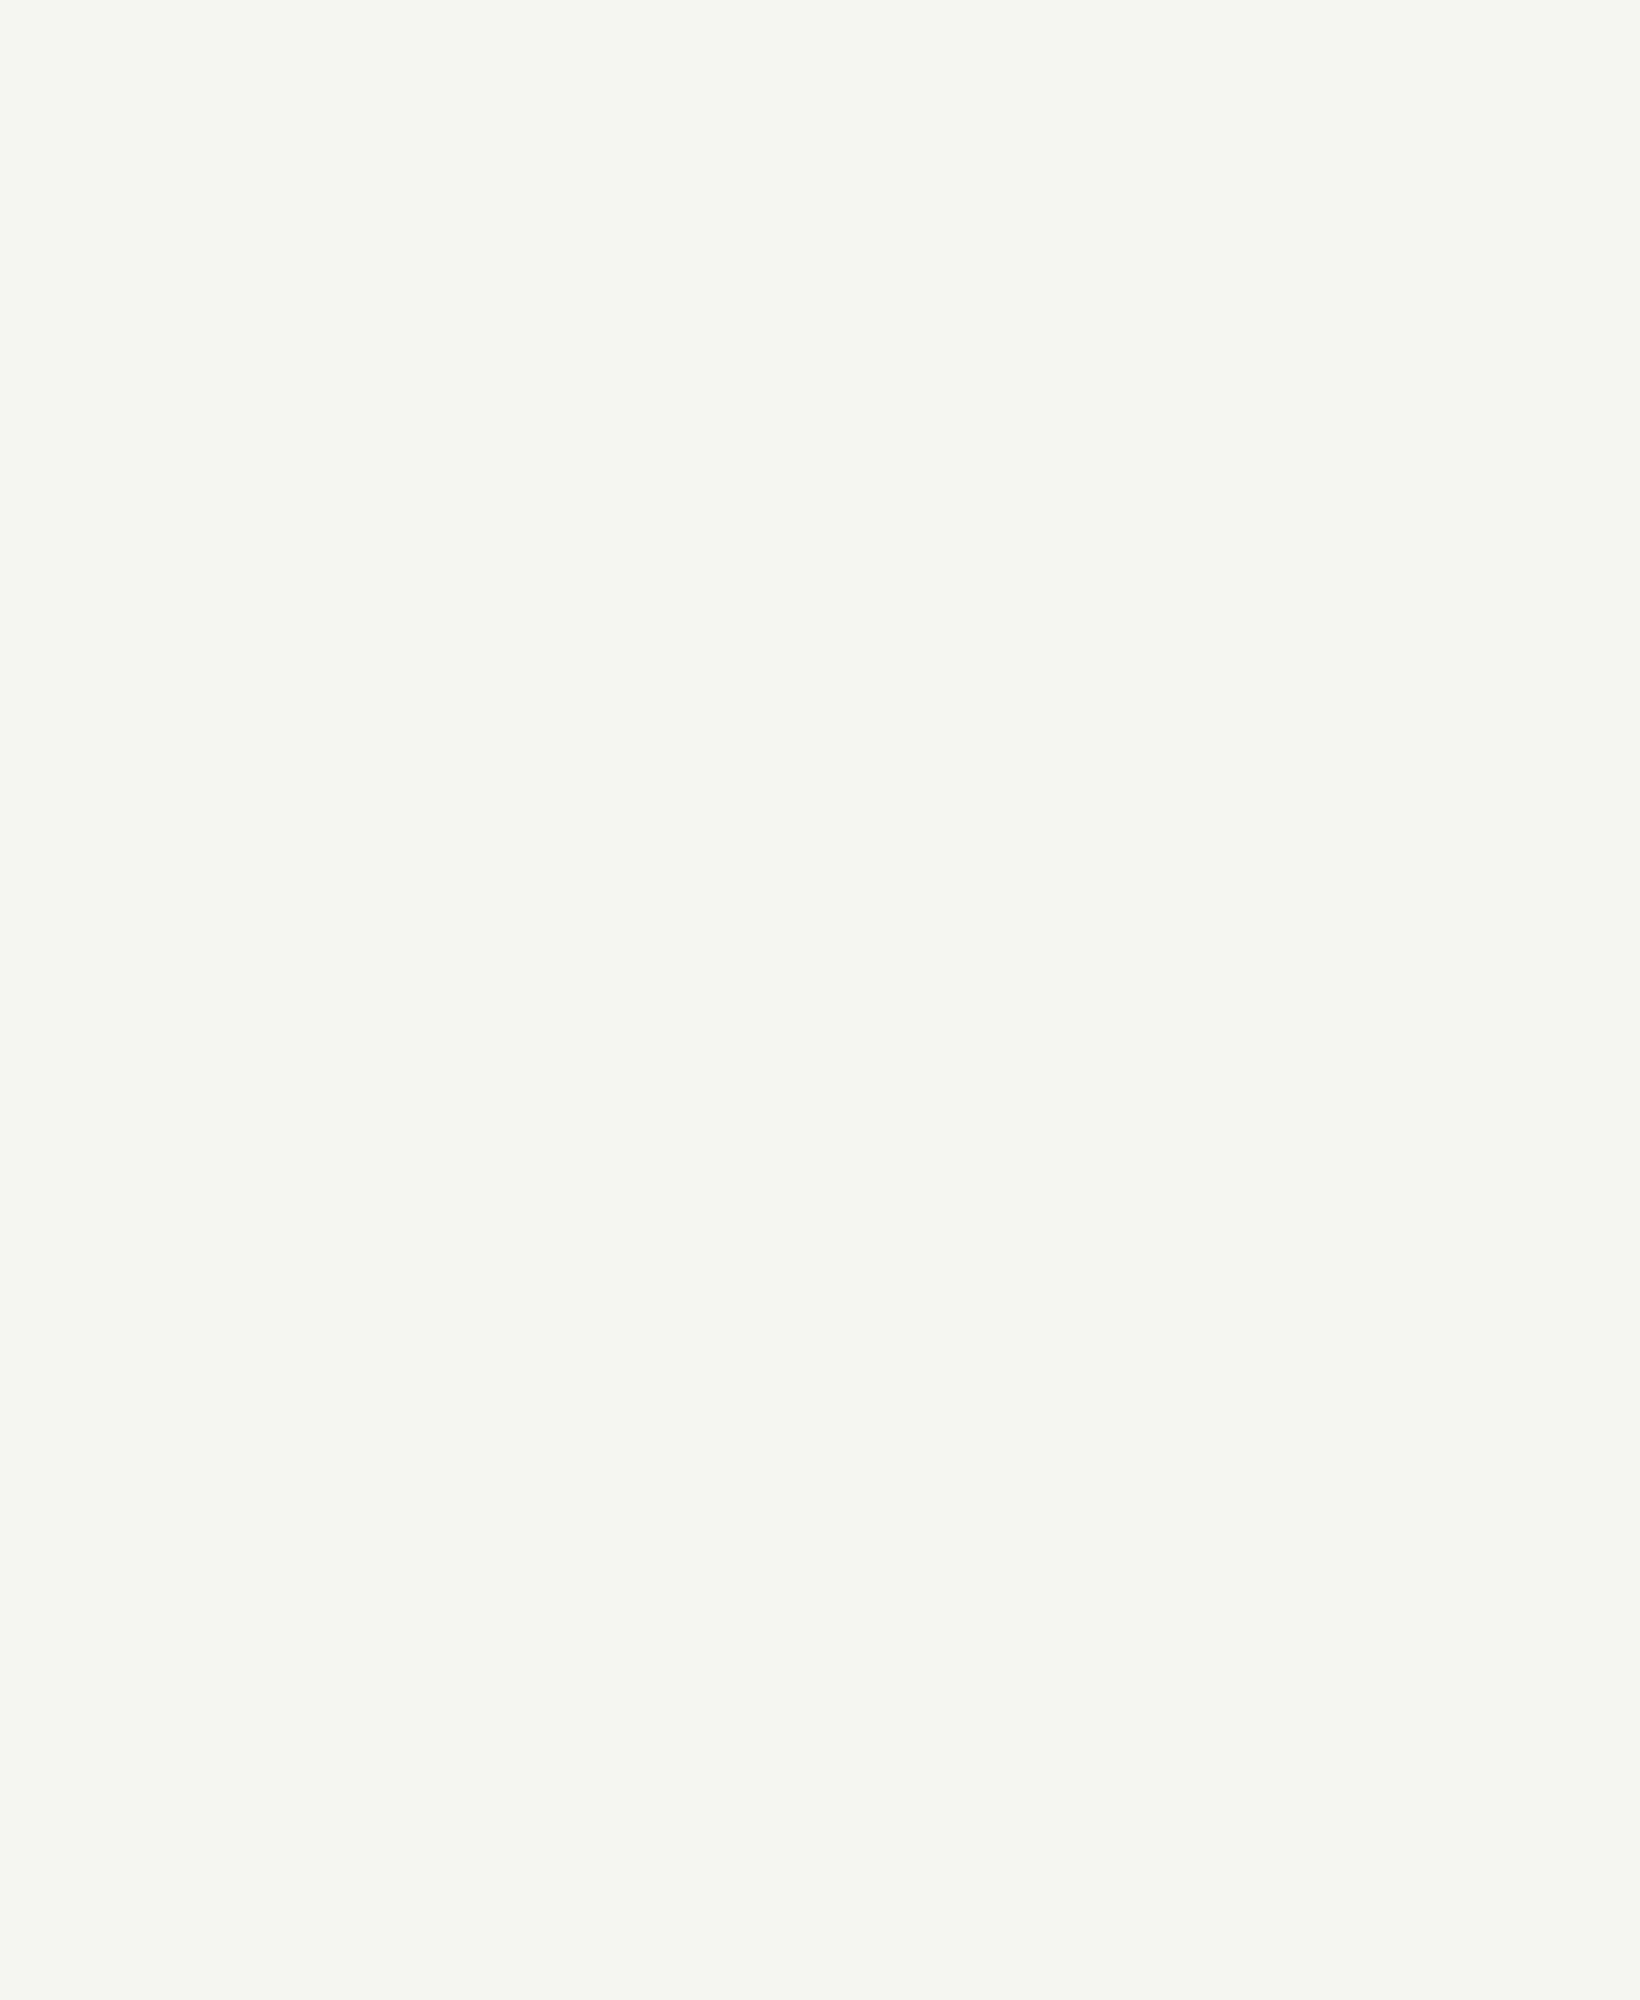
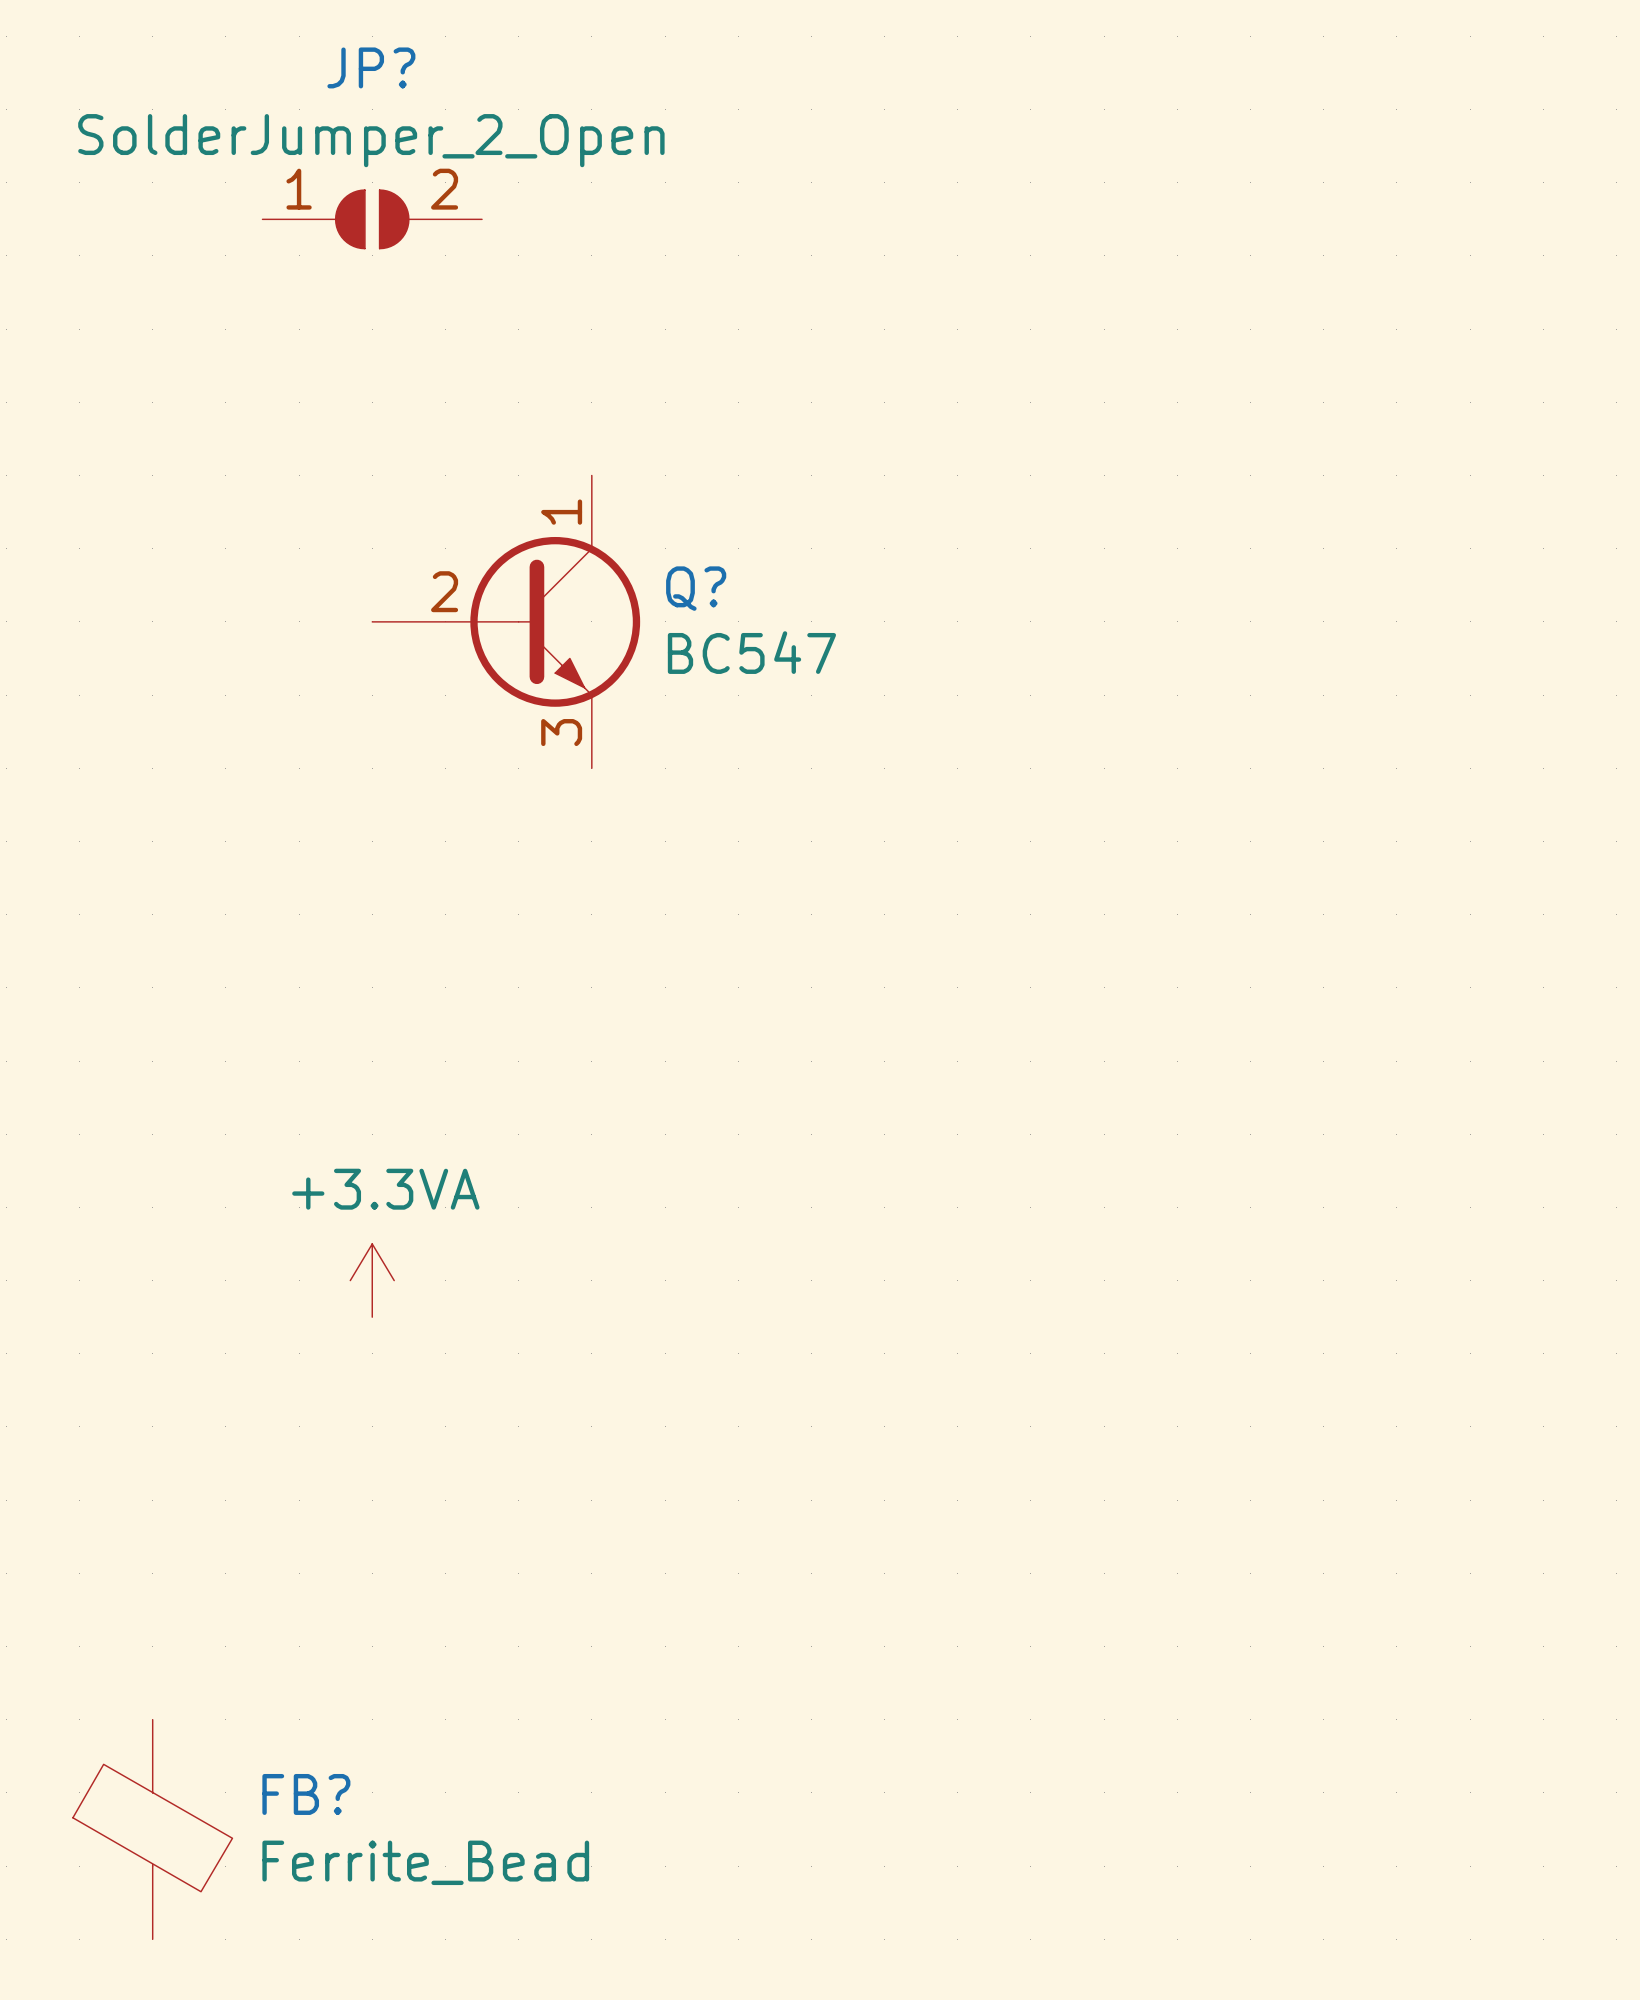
JP?: none -> SolderJumper_2_Open (372, 219)
Q?: none -> BC547 (506, 621)
power symbol: none -> +3.3VA (372, 1280)
FB?: none -> Ferrite_Bead (152, 1829)

